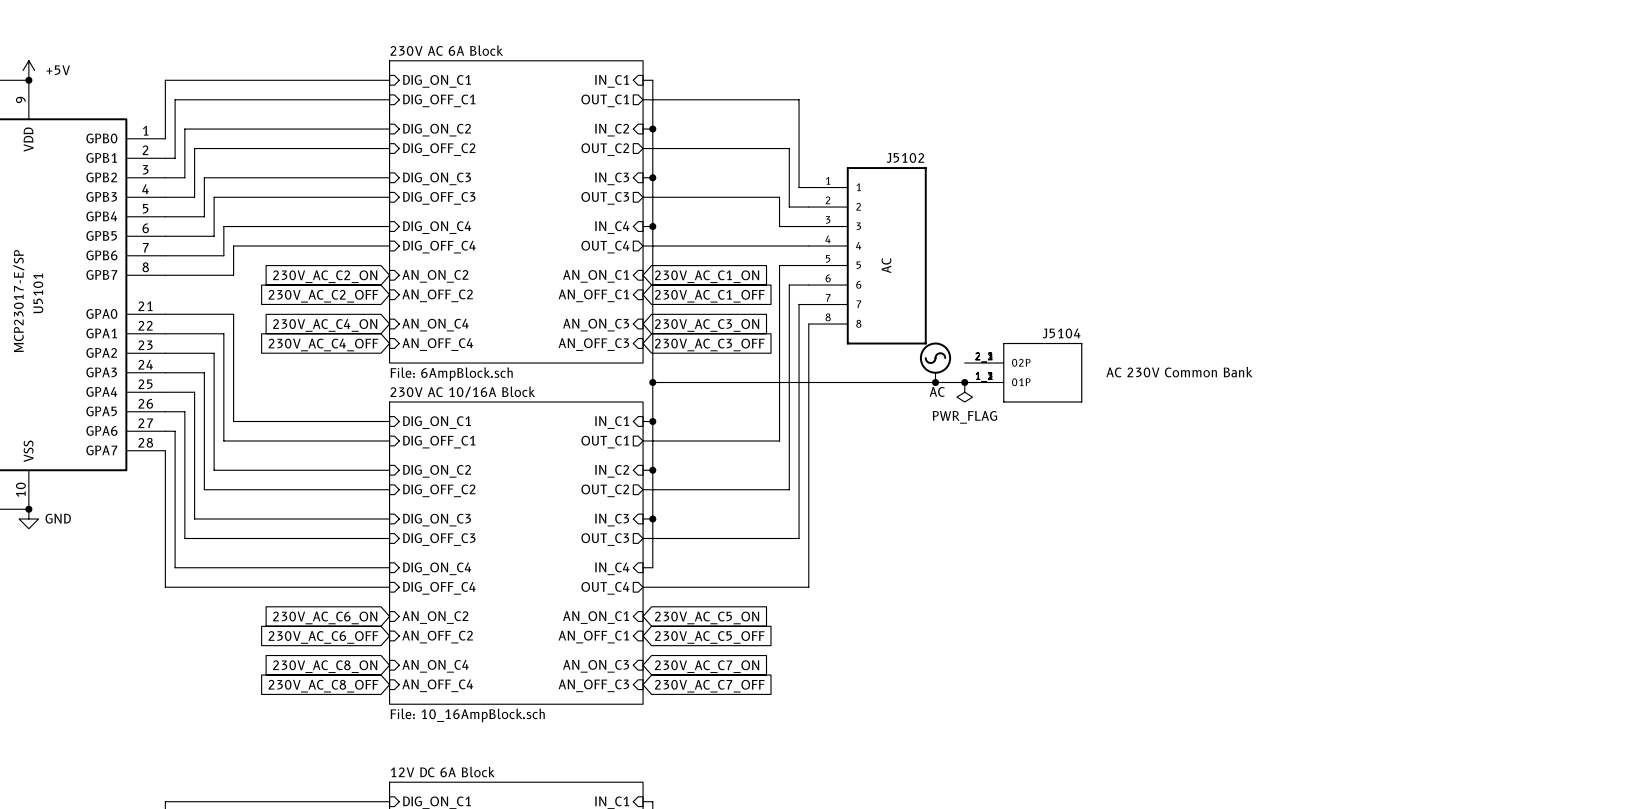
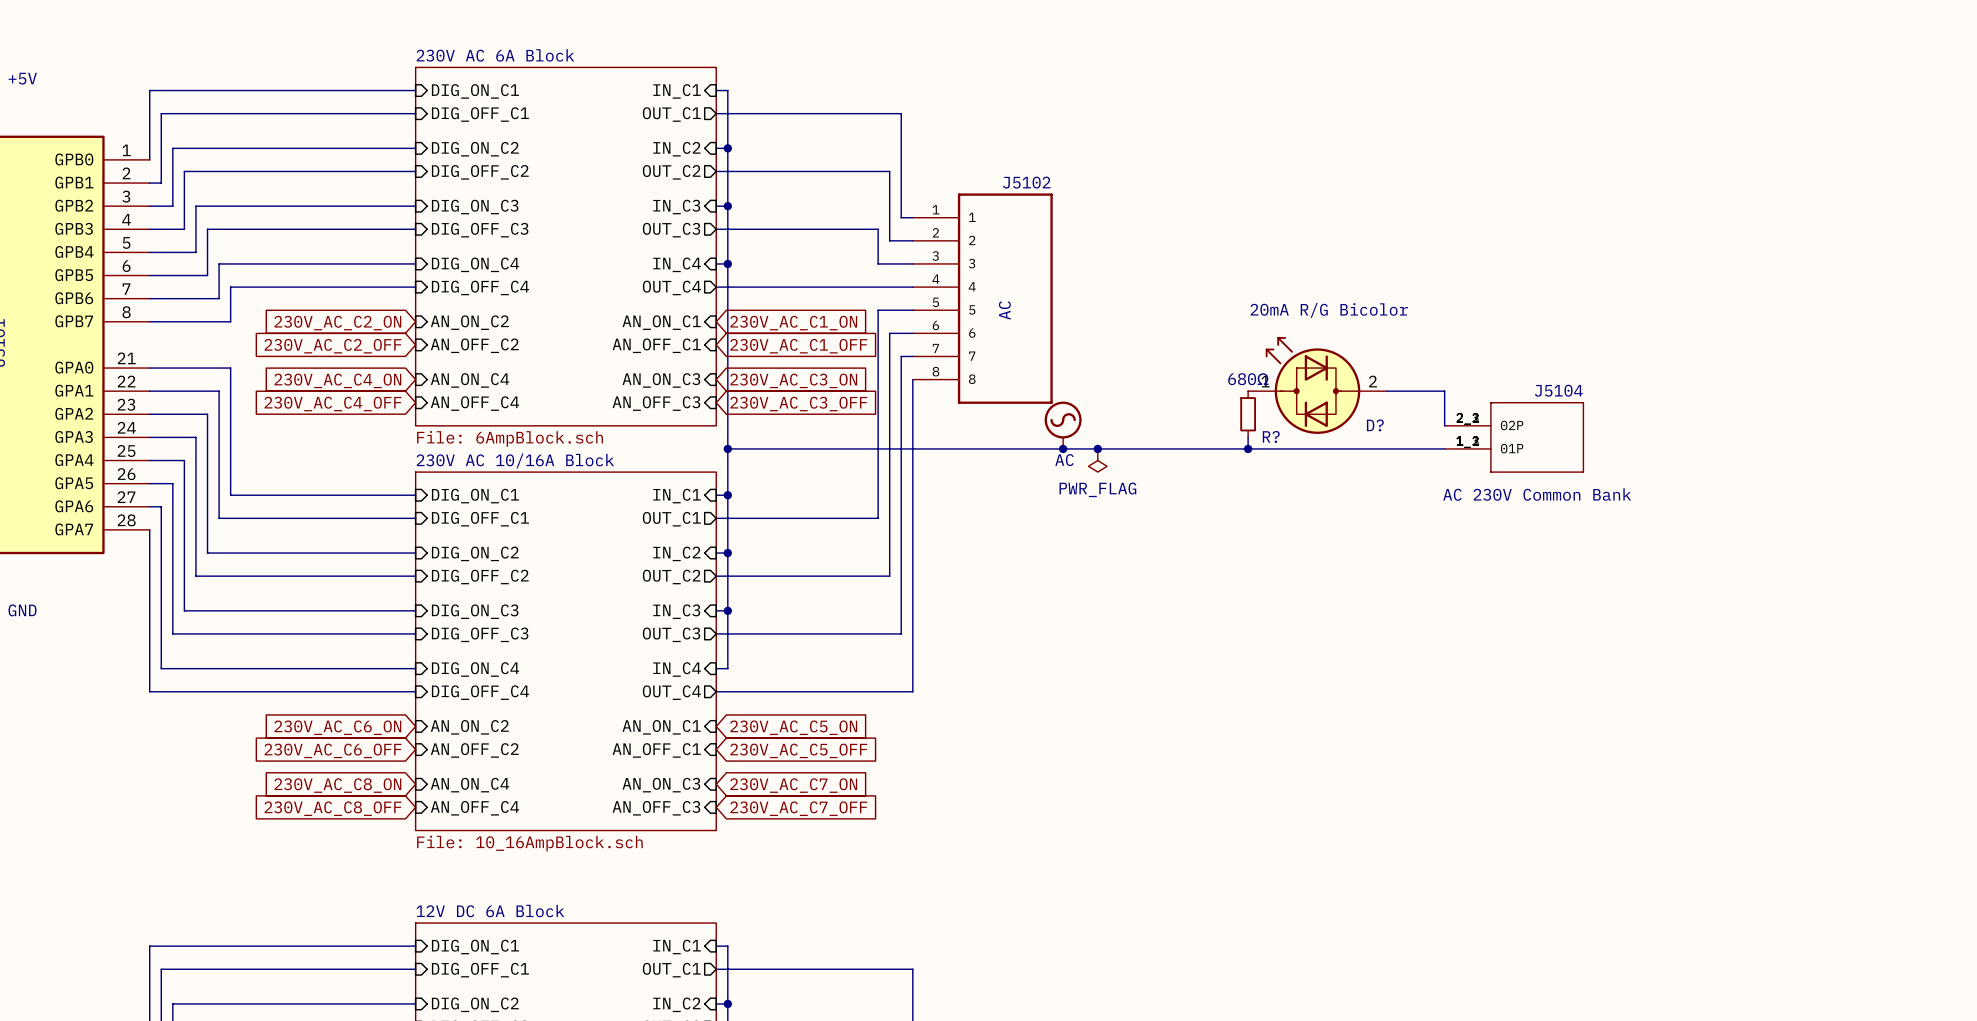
D?: none -> 20mA R/G Bicolor (1317, 385)
wire: none -> (1386, 391) (1444, 391) (1444, 425)
R?: none -> 680Ω (1248, 414)
J5104 position: (1023, 372) -> (1514, 437)
wire: none -> (1248, 437) (1248, 448)
J5104 text position: AC 230V Common Bank (1179, 372) -> AC 230V Common Bank (1537, 494)
wire: none -> (1097, 448) (1444, 448)
junction: none -> (1248, 448)

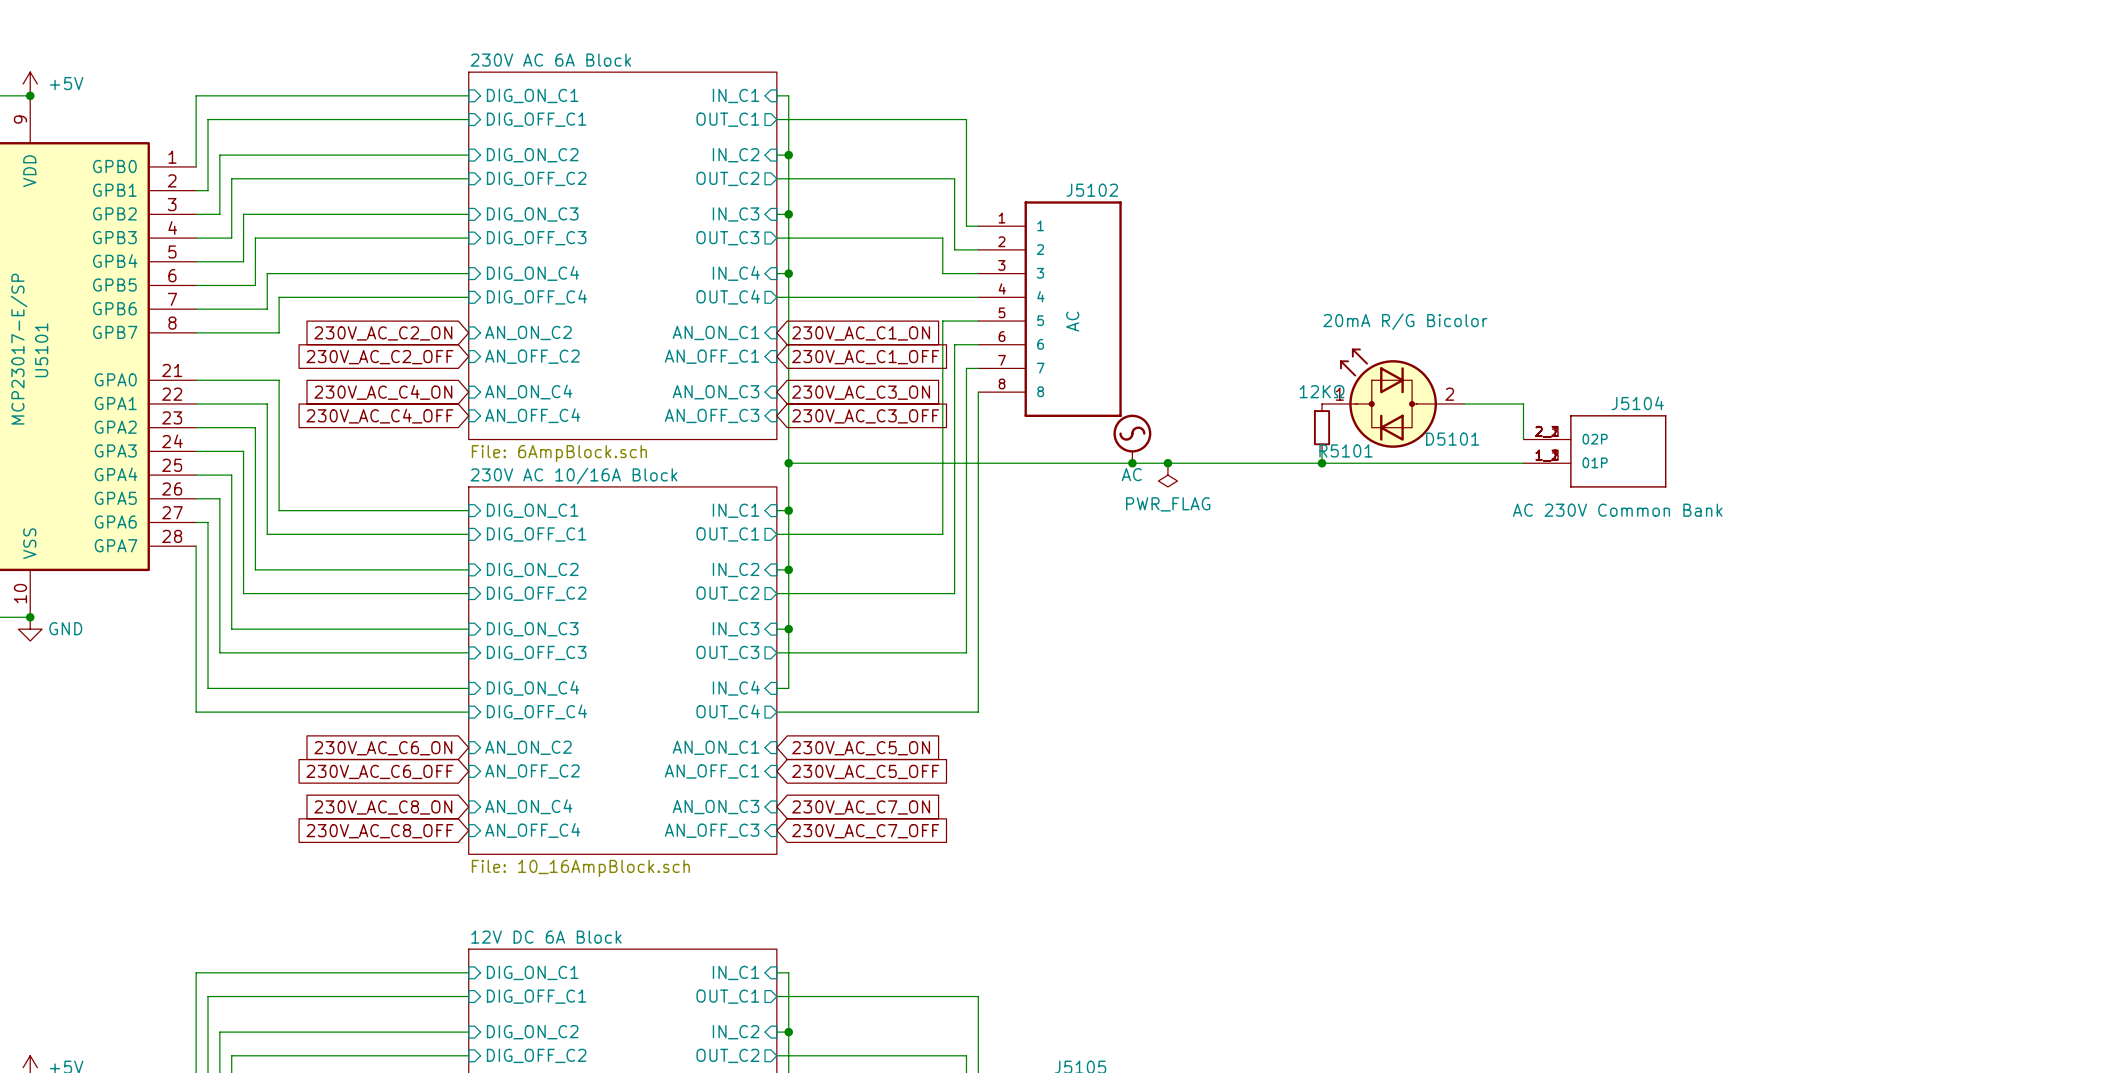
R? value: 680Ω (1248, 379) -> 12KΩ (1322, 391)
D? name: D? (1375, 425) -> D5101 (1452, 439)
R? name: R? (1271, 436) -> R5101 (1346, 450)

